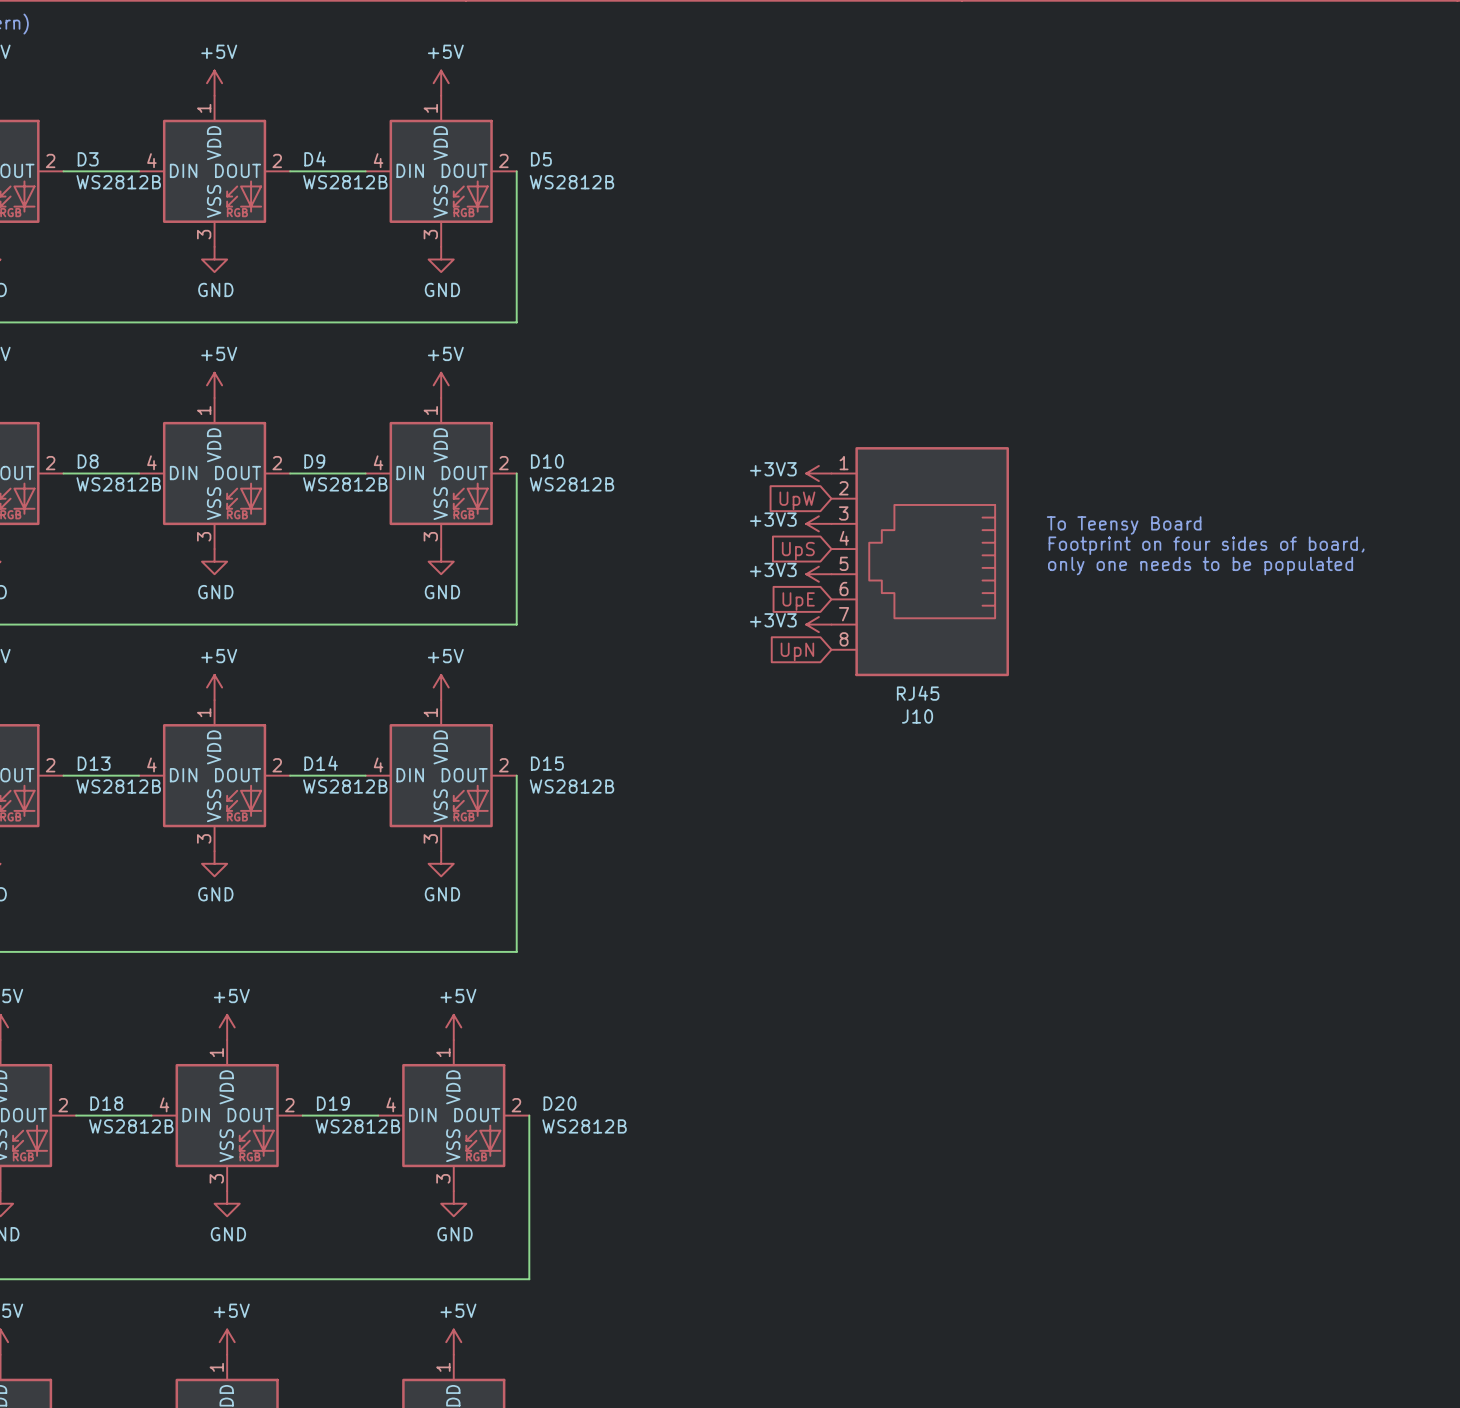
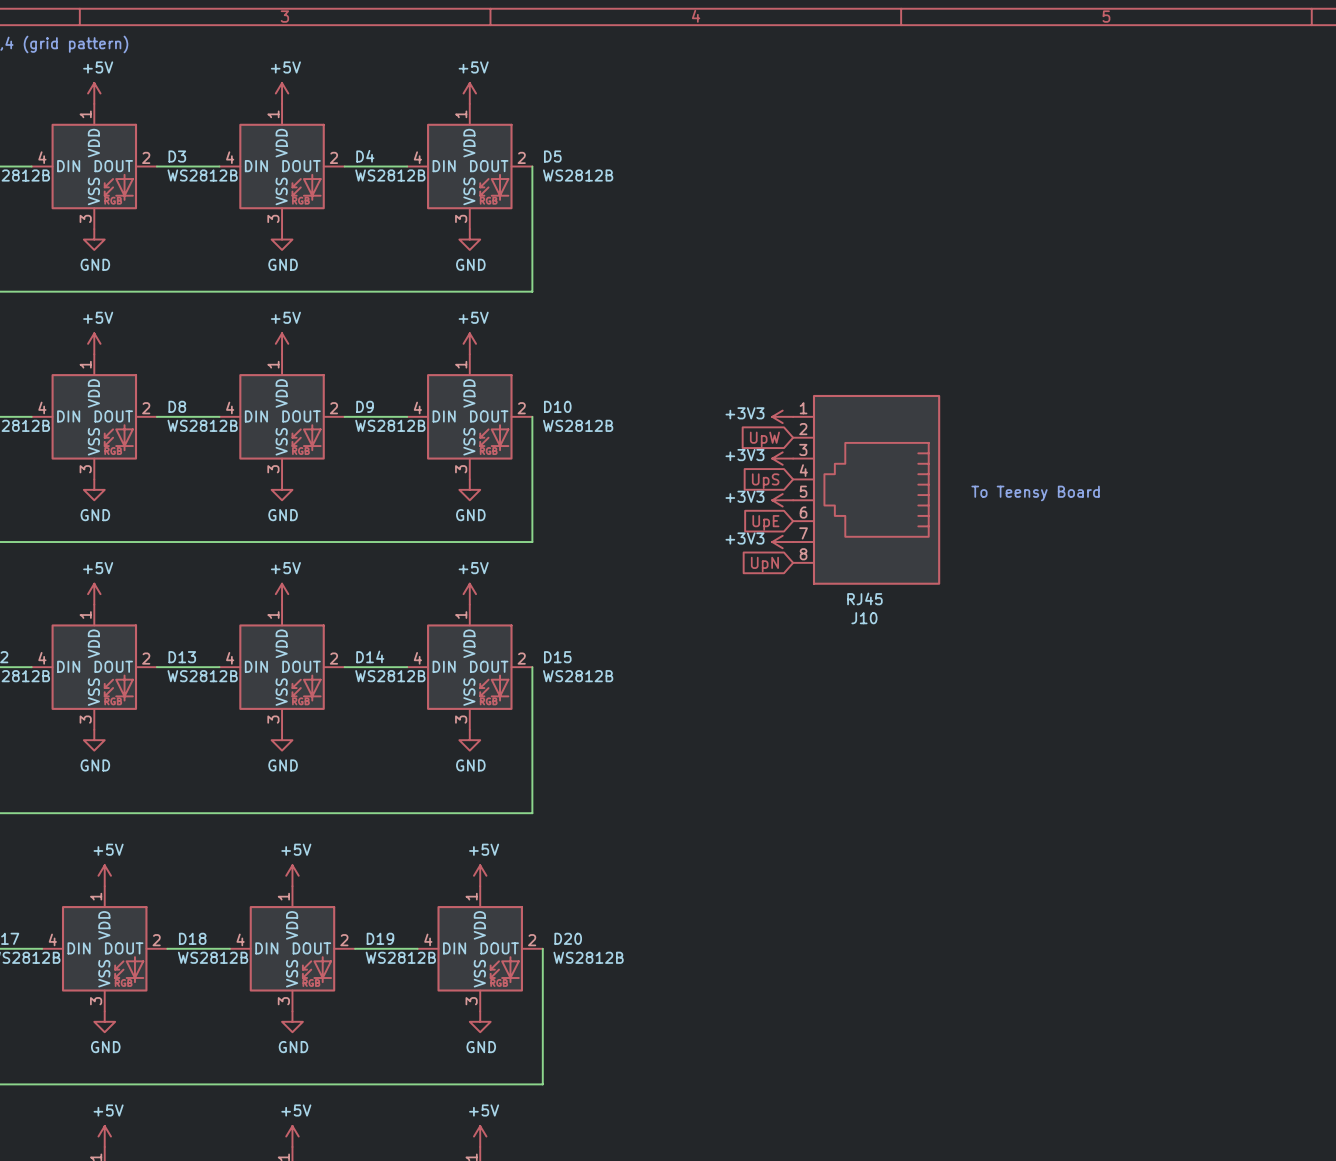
text: To Teensy Board (1124, 525) -> none
text: Footprint on four sides of board, (1206, 545) -> none
text: only one needs to be populated (1200, 566) -> To Teensy Board (1035, 493)

